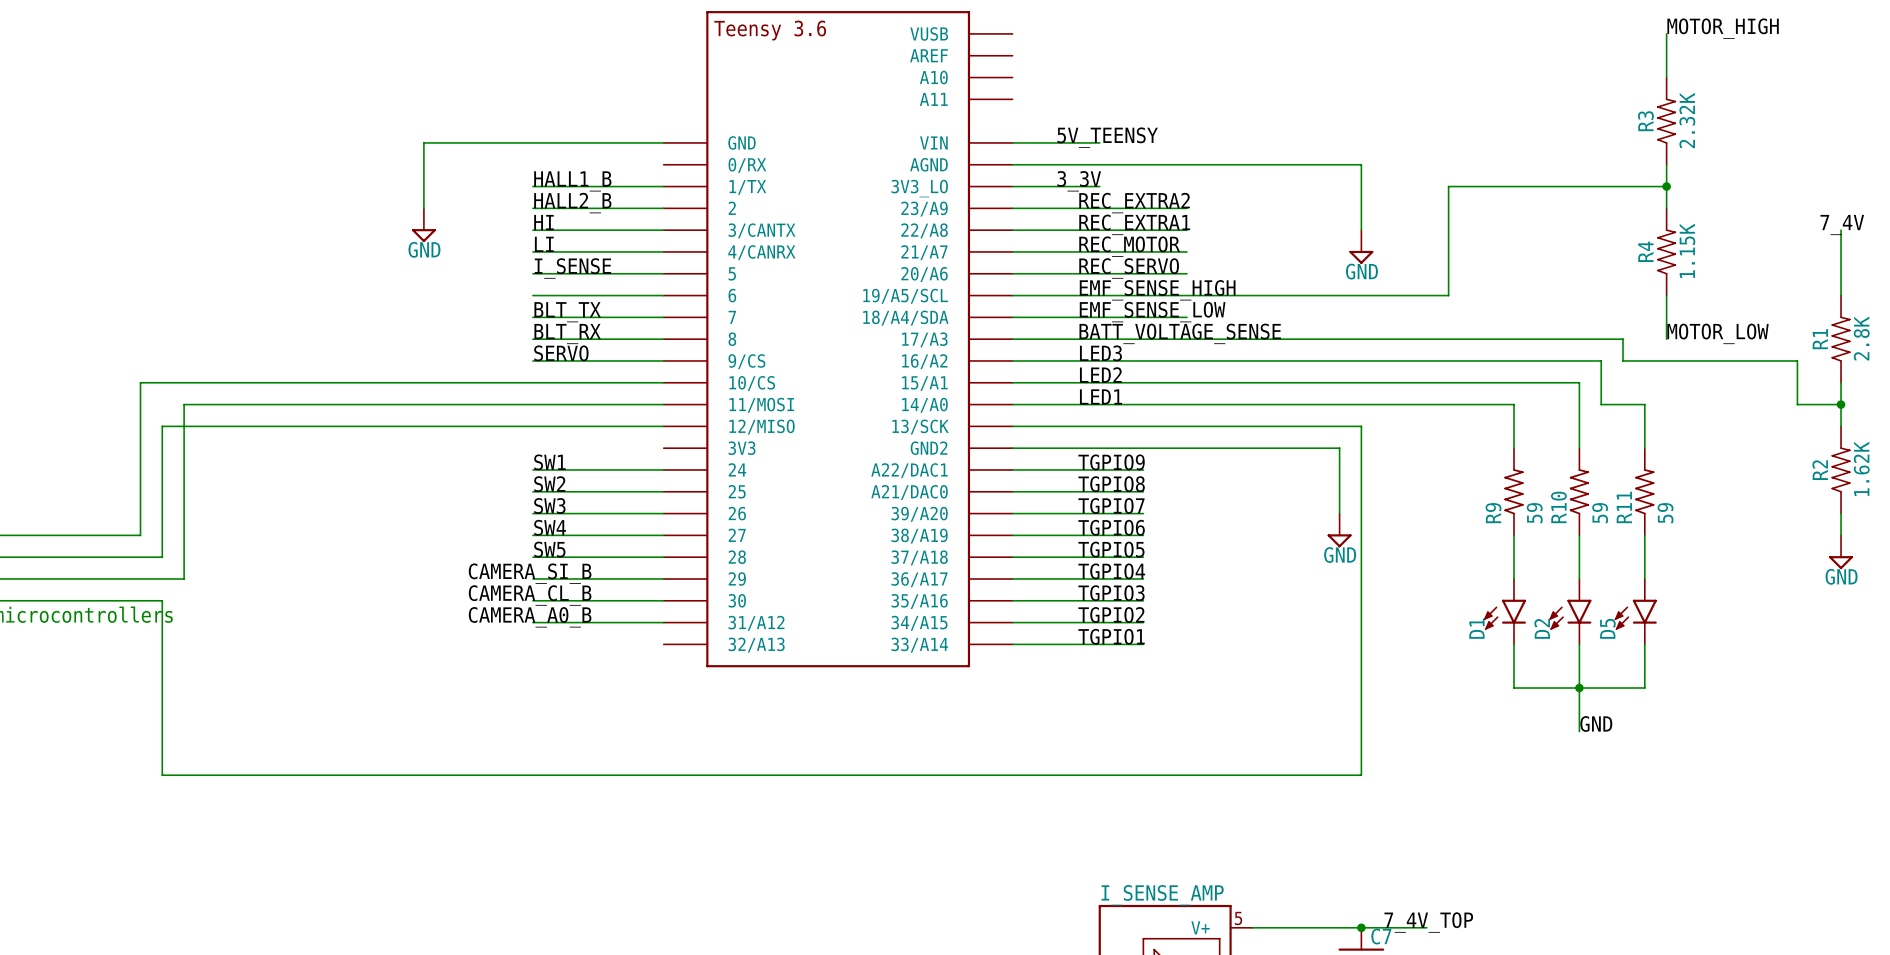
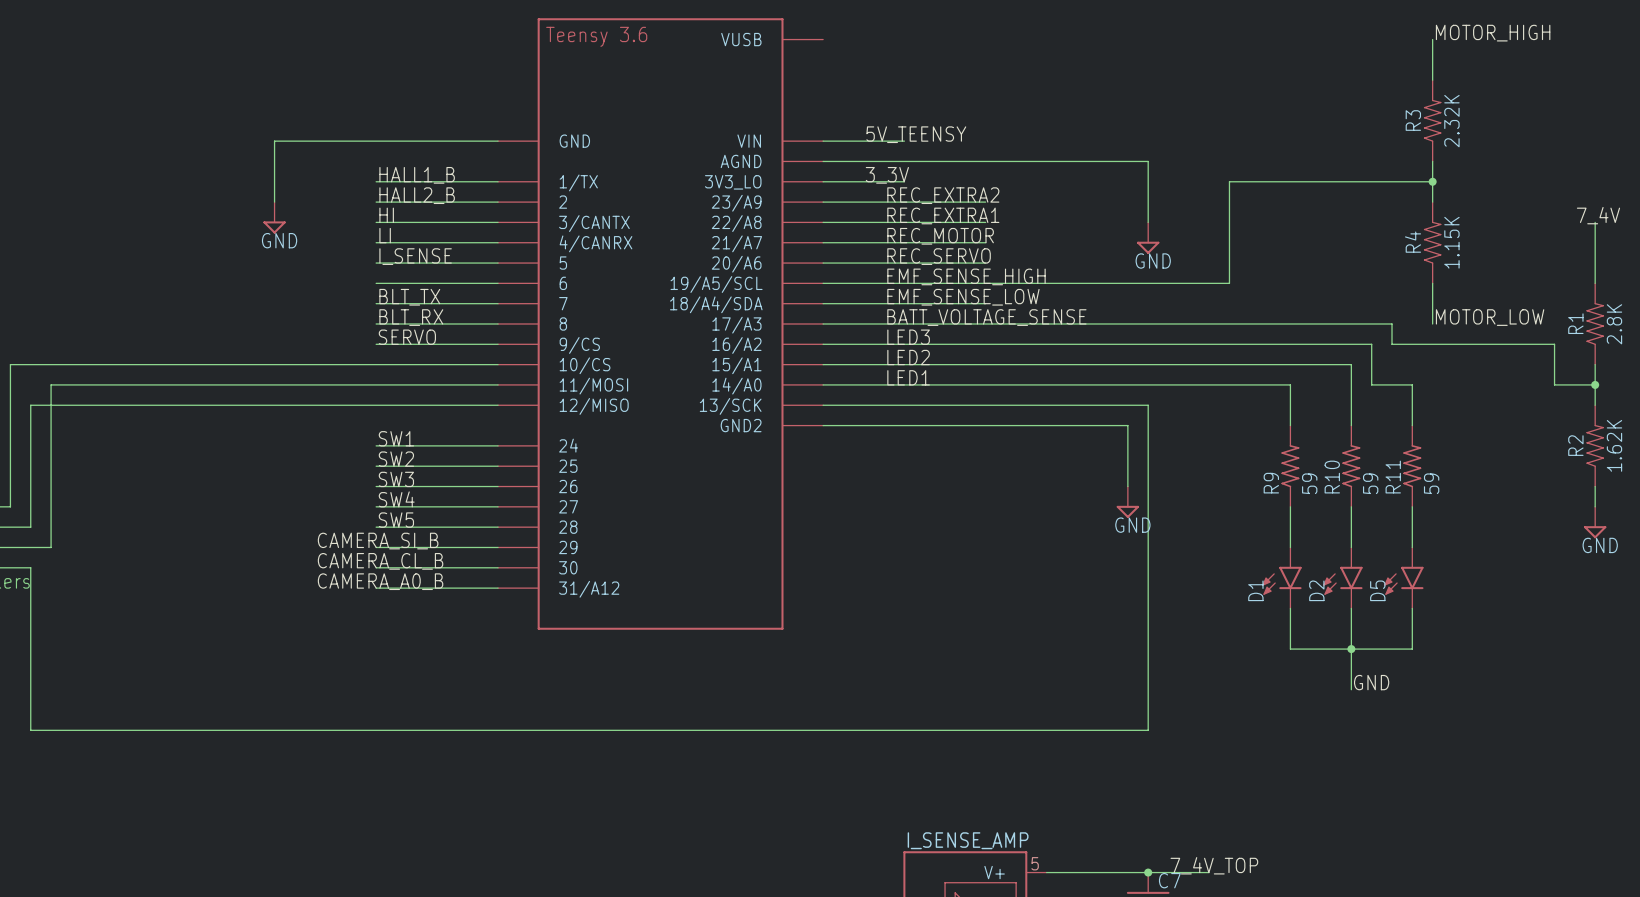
part symbol: [663, 11, 1013, 668] -> [498, 18, 824, 630]
label: TGPIO9 (1111, 462) -> none
wire: (1012, 469) (1143, 469) -> none
label: TGPIO8 (1111, 484) -> none
wire: (1012, 491) (1143, 491) -> none
label: TGPIO7 (1111, 505) -> none
wire: (1012, 513) (1143, 513) -> none
label: TGPIO6 (1111, 527) -> none
wire: (1012, 535) (1143, 535) -> none
label: TGPIO5 (1111, 549) -> none
wire: (1012, 557) (1143, 557) -> none
label: TGPIO4 (1111, 571) -> none
wire: (1012, 578) (1143, 578) -> none
label: TGPIO3 (1111, 593) -> none
wire: (1012, 600) (1143, 600) -> none
label: TGPIO2 (1111, 614) -> none
wire: (1012, 622) (1143, 622) -> none
label: TGPIO1 (1111, 636) -> none
wire: (1012, 644) (1143, 644) -> none

